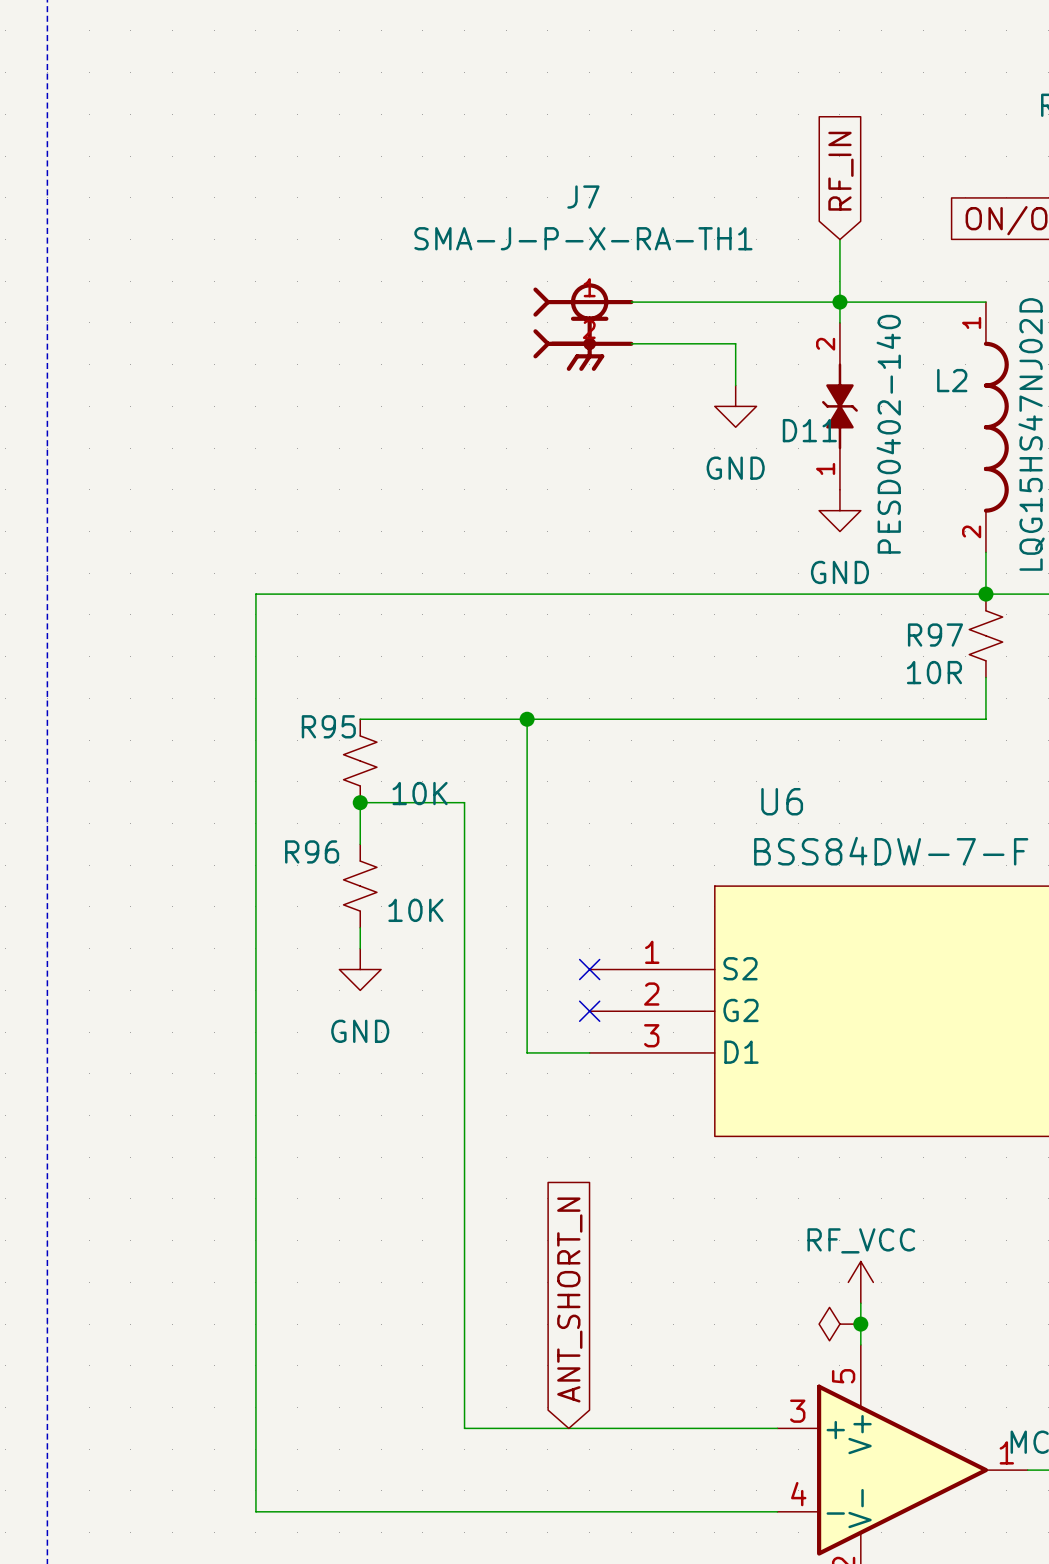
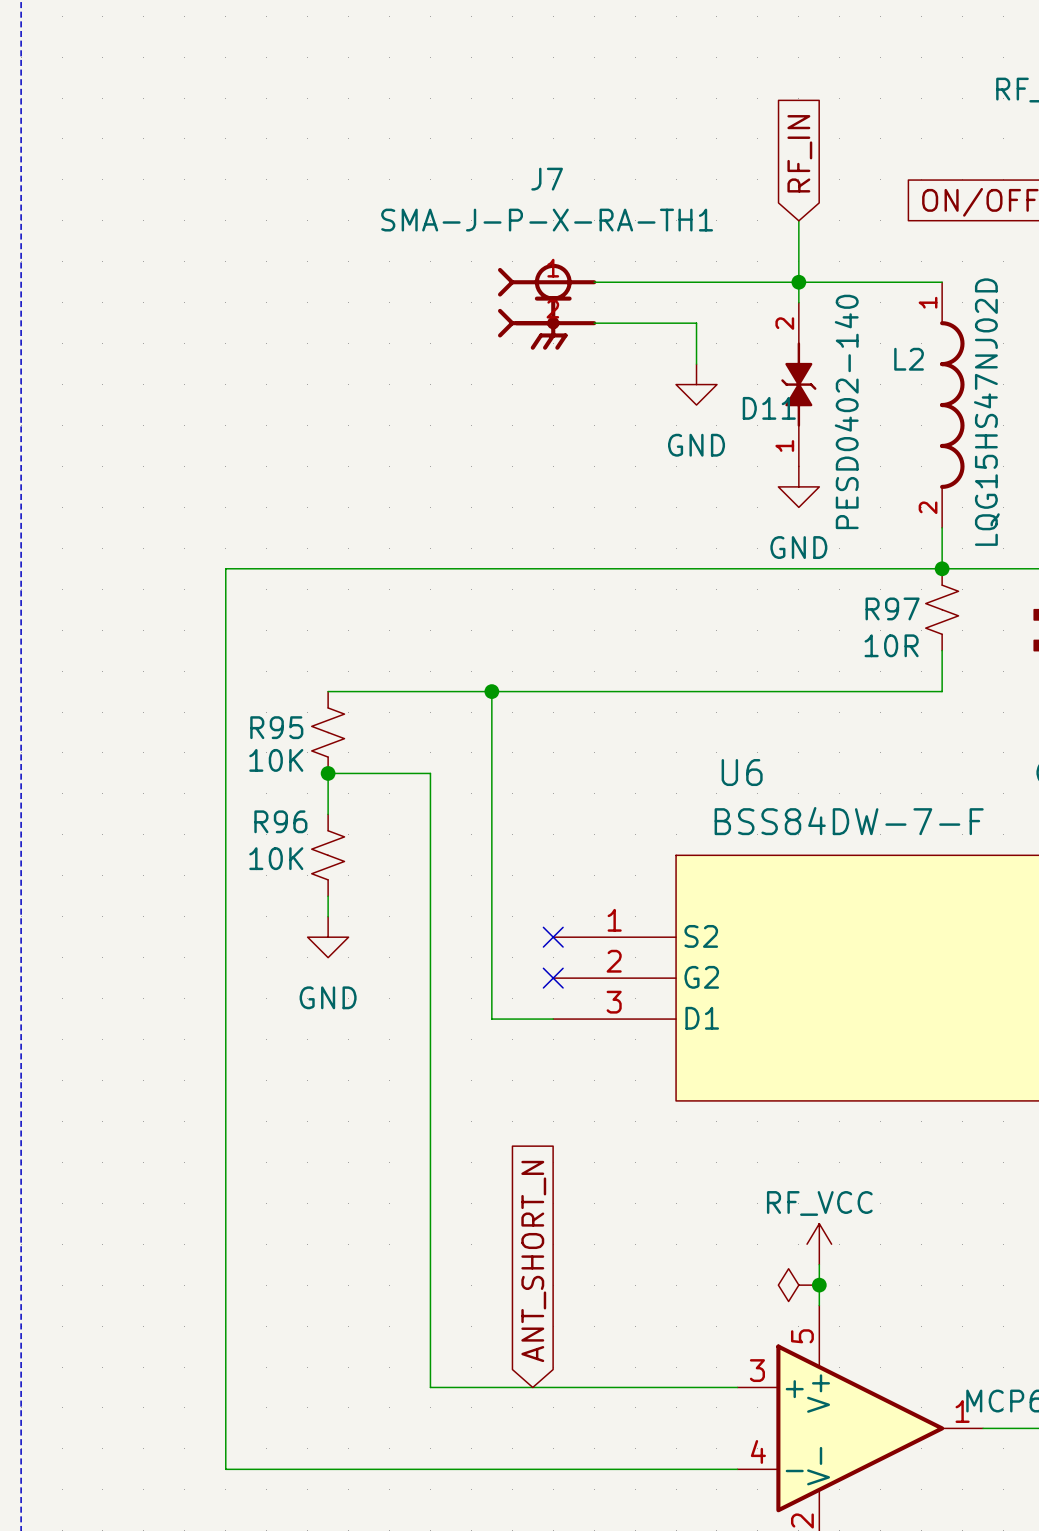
R95 name position: R95 (328, 726) -> R95 (276, 727)
R95 value position: 10K (420, 793) -> 10K (276, 760)
R96 value position: 10K (415, 910) -> 10K (276, 858)

